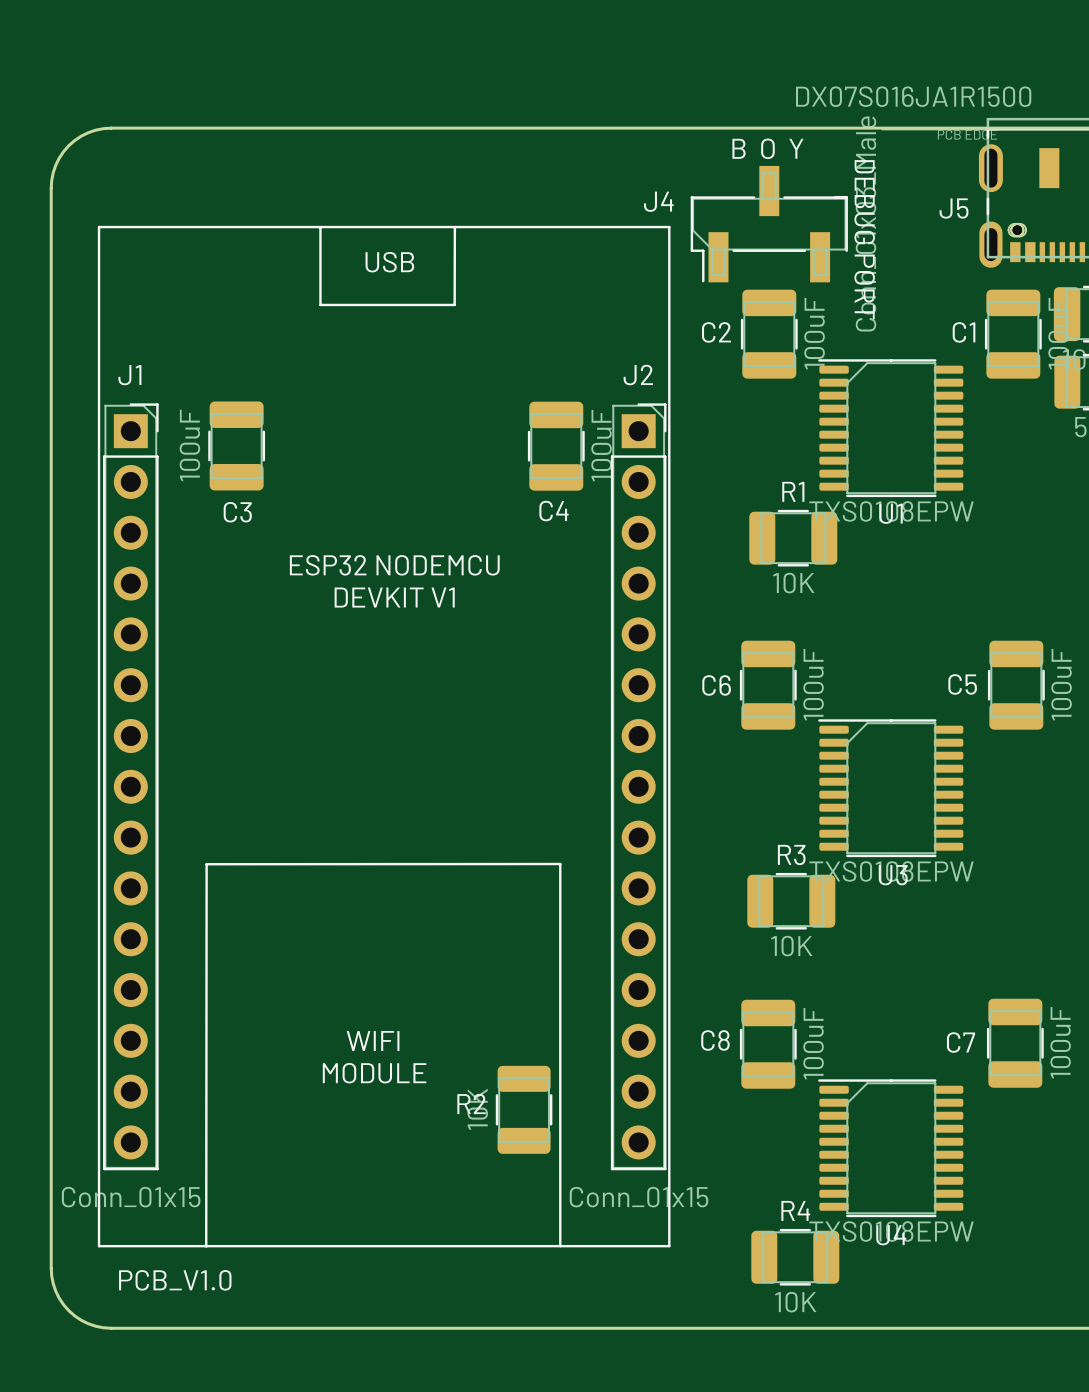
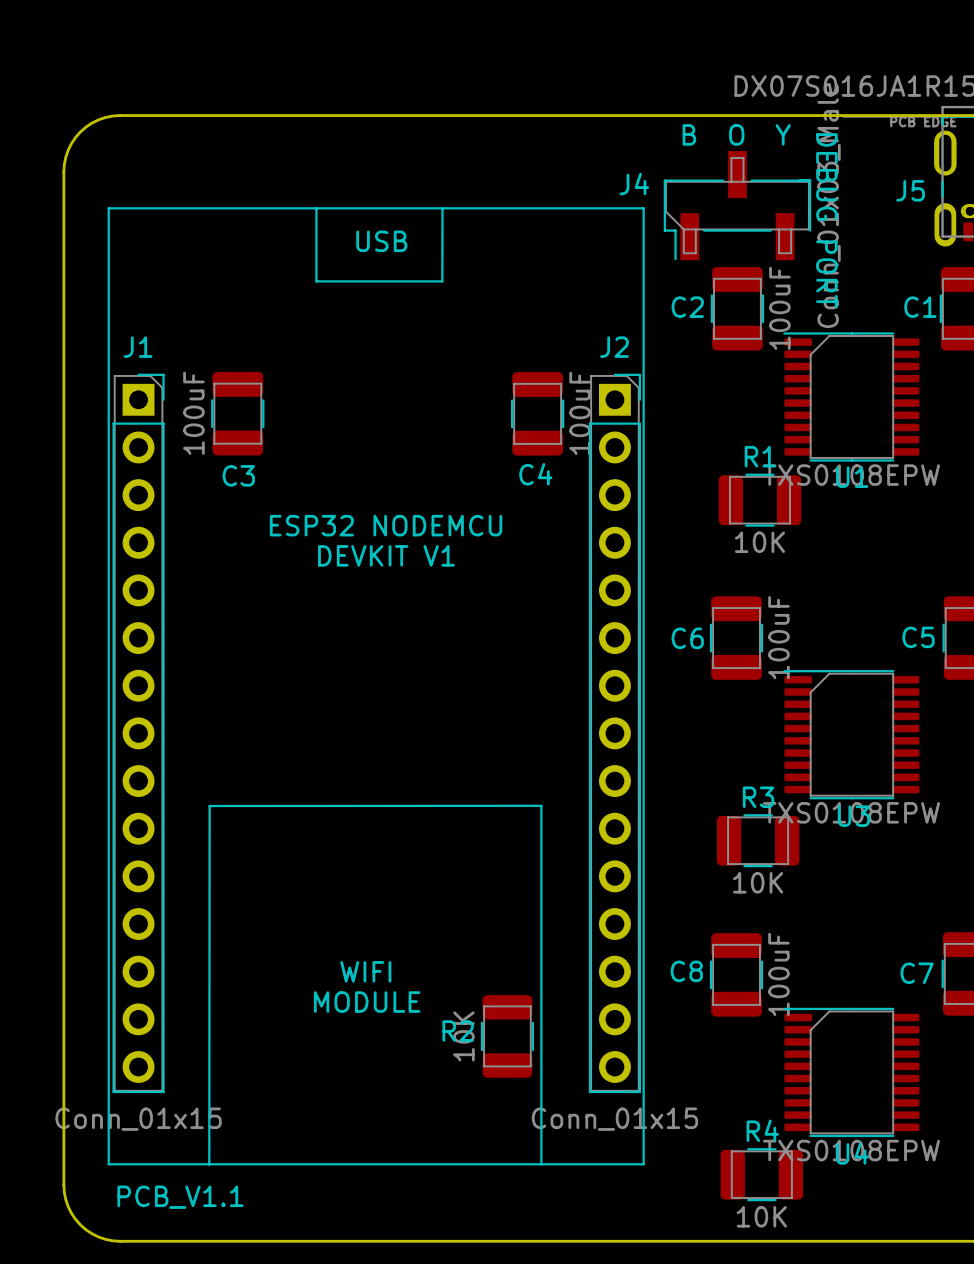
text: PCB_V1.0 (175, 1280) -> PCB_V1.1 (180, 1197)

